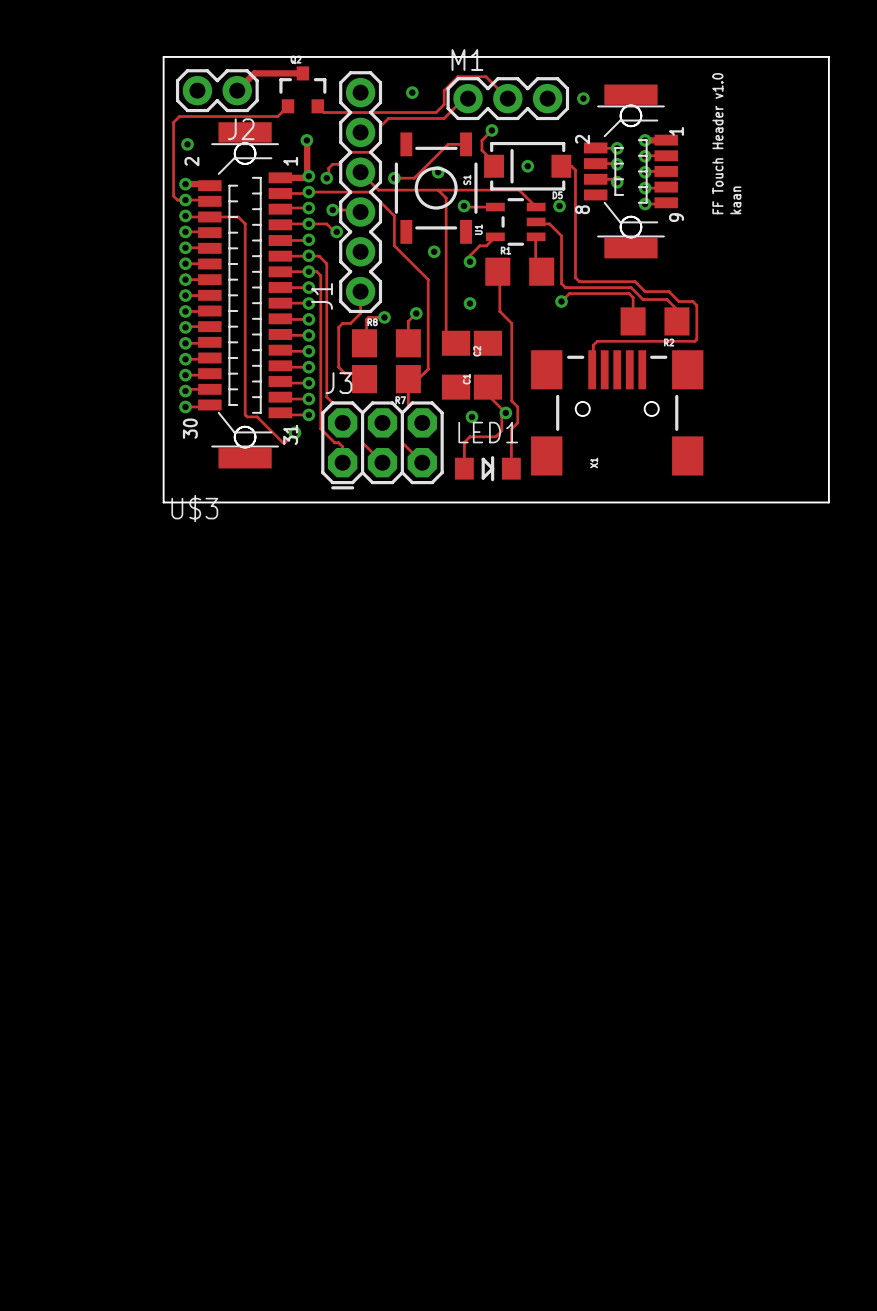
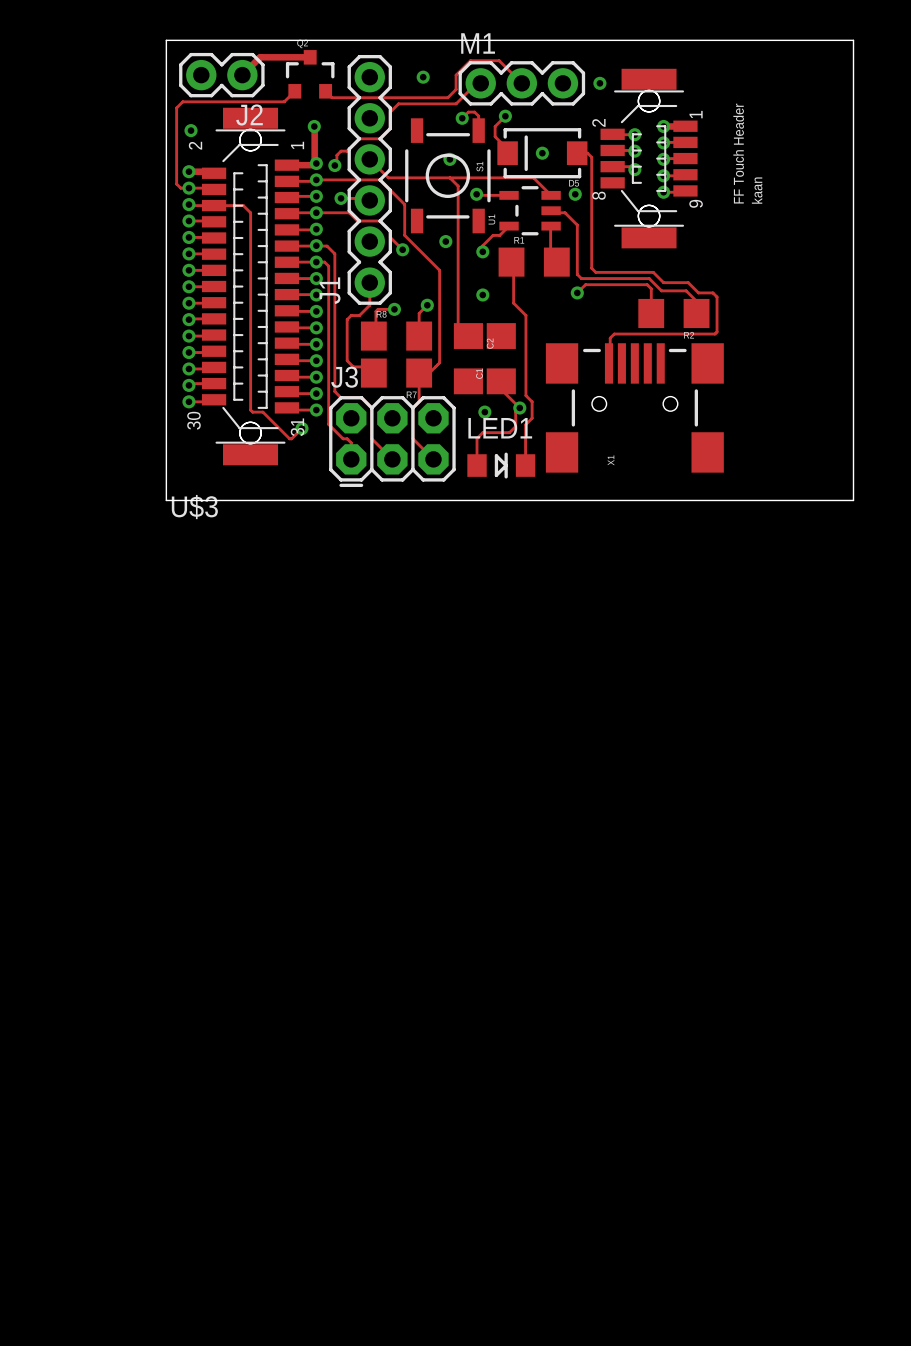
via: none -> (462, 118)
text: FF Touch Header v1.0 (717, 143) -> FF Touch Header (738, 153)
track: (466, 144) (448, 144) (414, 178) (394, 178) -> (478, 130) (478, 116) (474, 112) (468, 112) (462, 118)
via: (394, 178) -> none
track: (326, 223) (336, 231) -> (334, 212) (349, 212) (357, 221) (380, 221) (390, 231) (390, 237) (402, 249)
via: (336, 231) -> none
via: none -> (402, 249)

